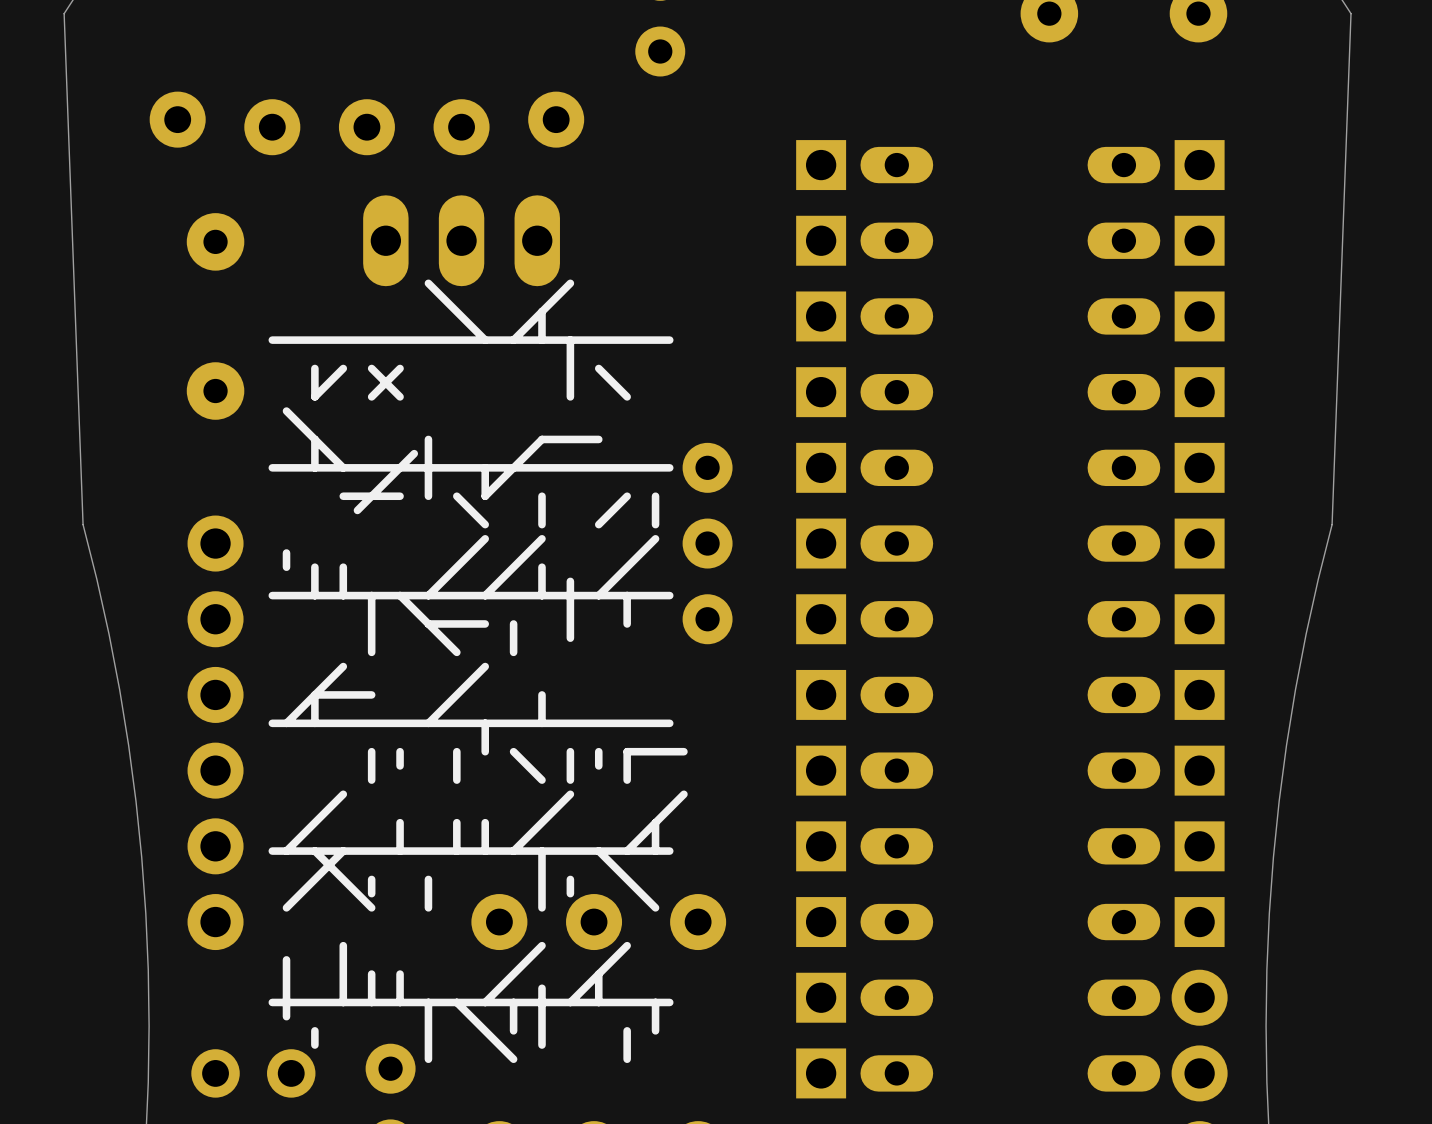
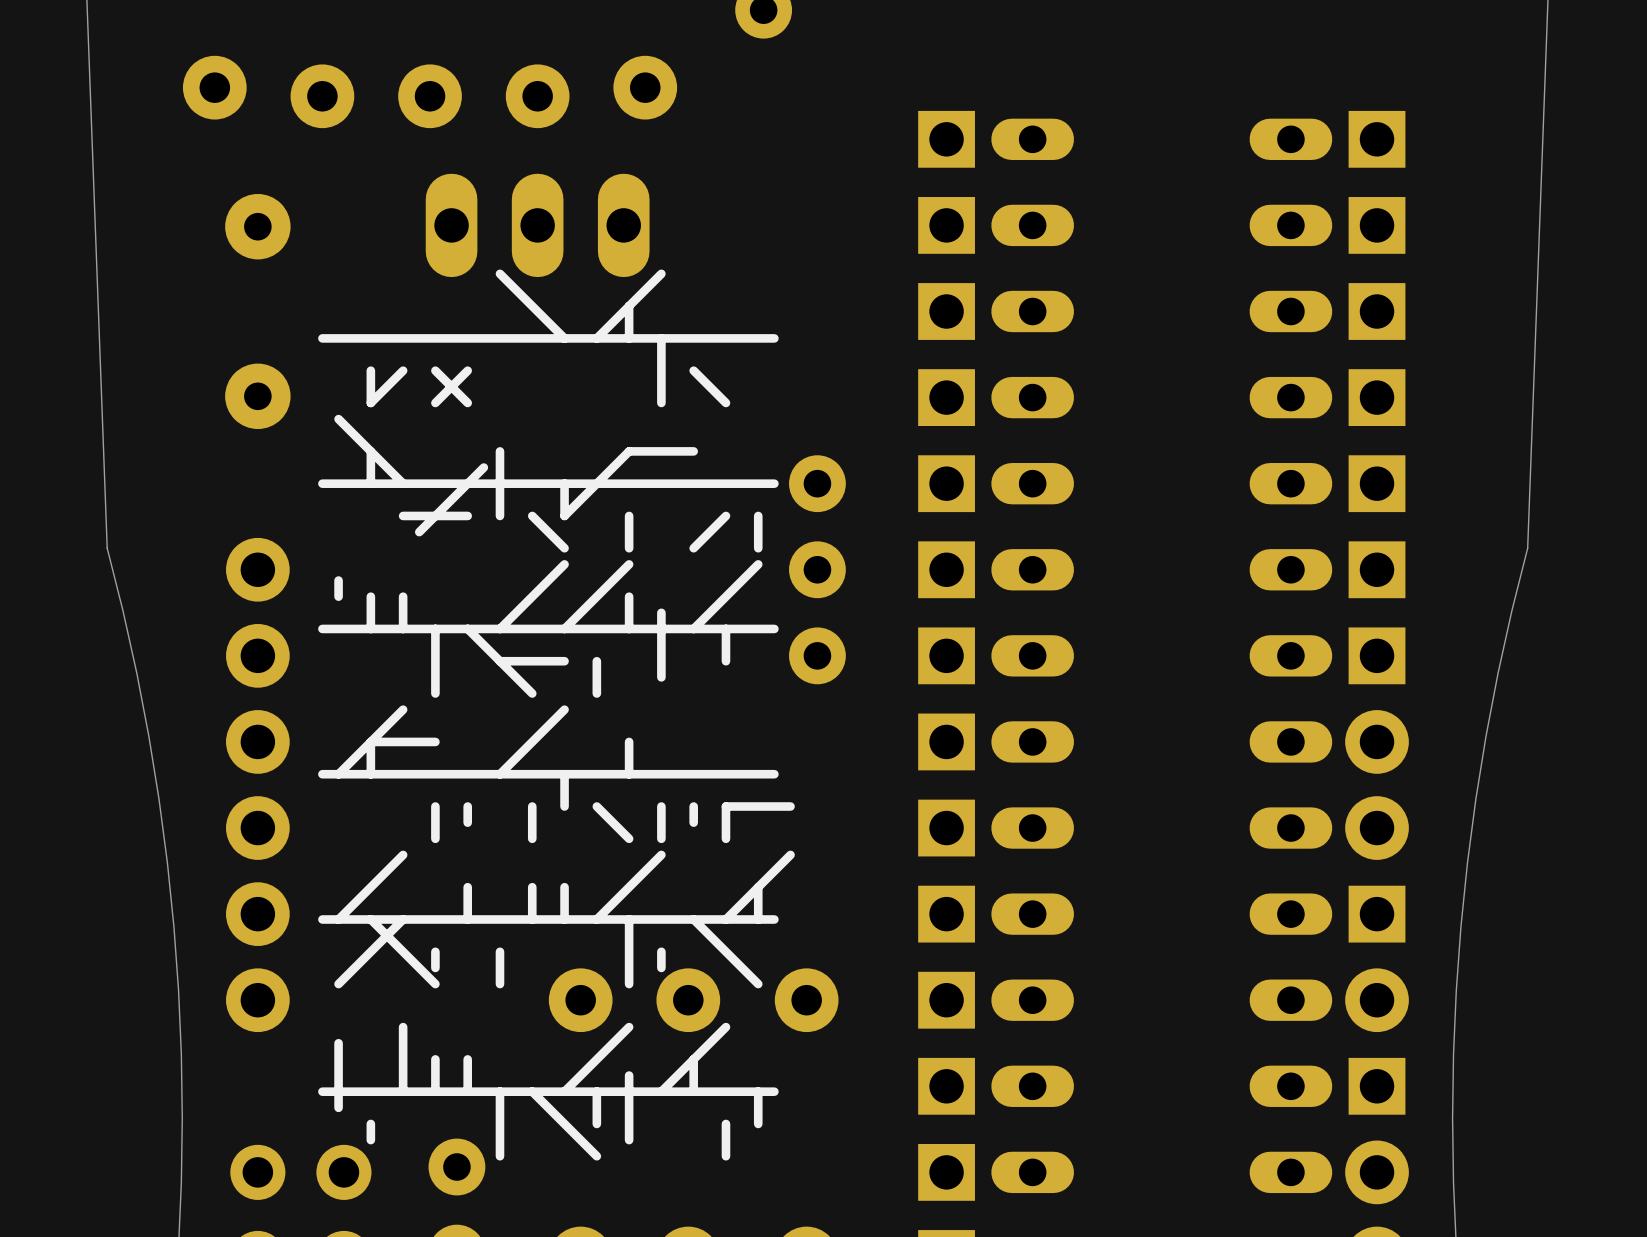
part footprint: [1174, 669, 1225, 720] -> [1345, 710, 1409, 774]
part footprint: [1174, 745, 1225, 796] -> [1345, 796, 1409, 860]
part footprint: [1174, 897, 1225, 948] -> [1345, 968, 1409, 1033]
part footprint: [1171, 969, 1228, 1026] -> [1348, 1057, 1406, 1115]

